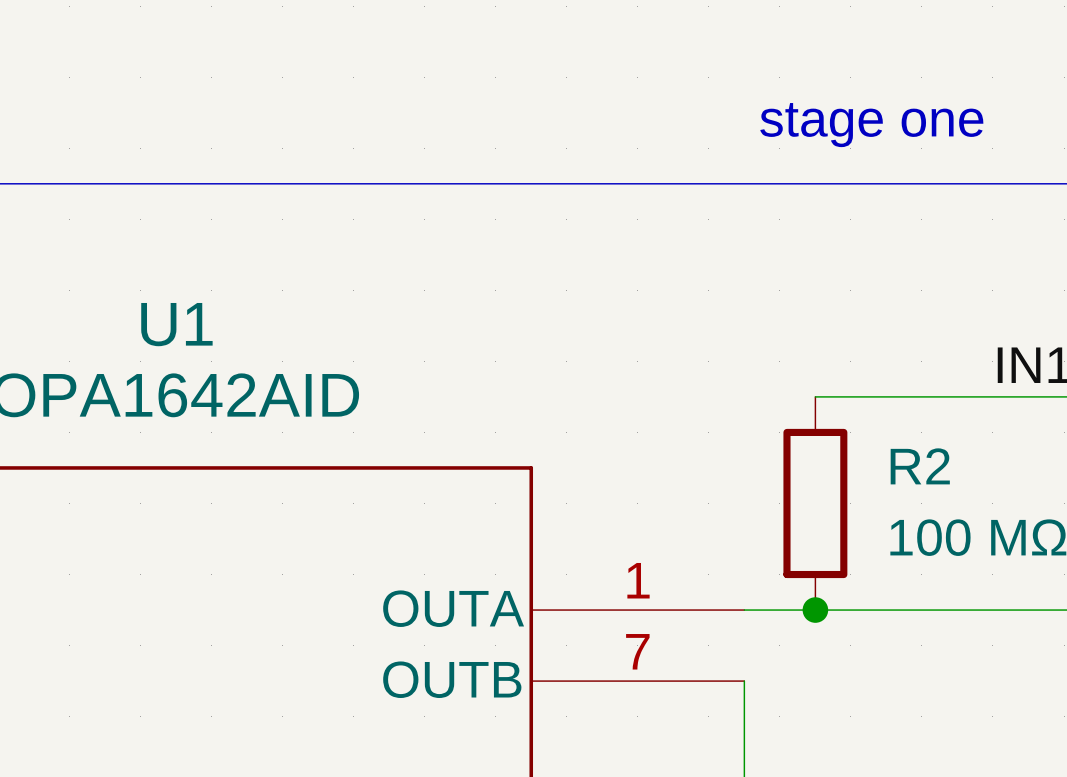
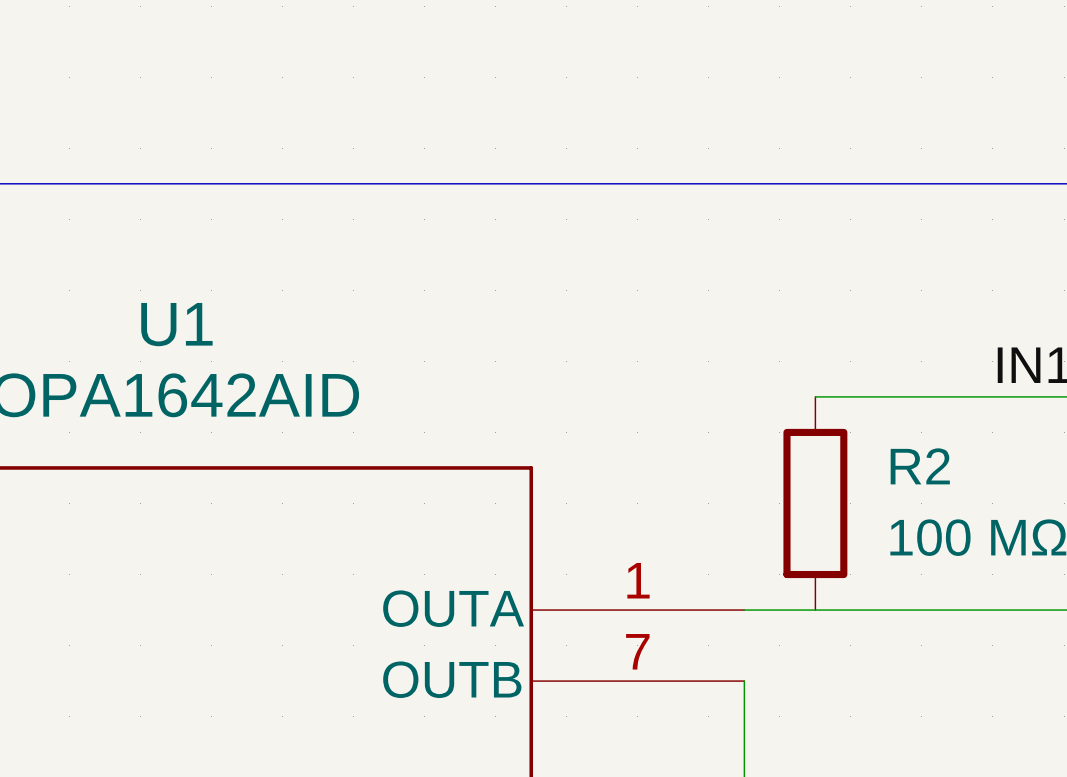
text: stage one (871, 125) -> none
junction: (815, 610) -> none

